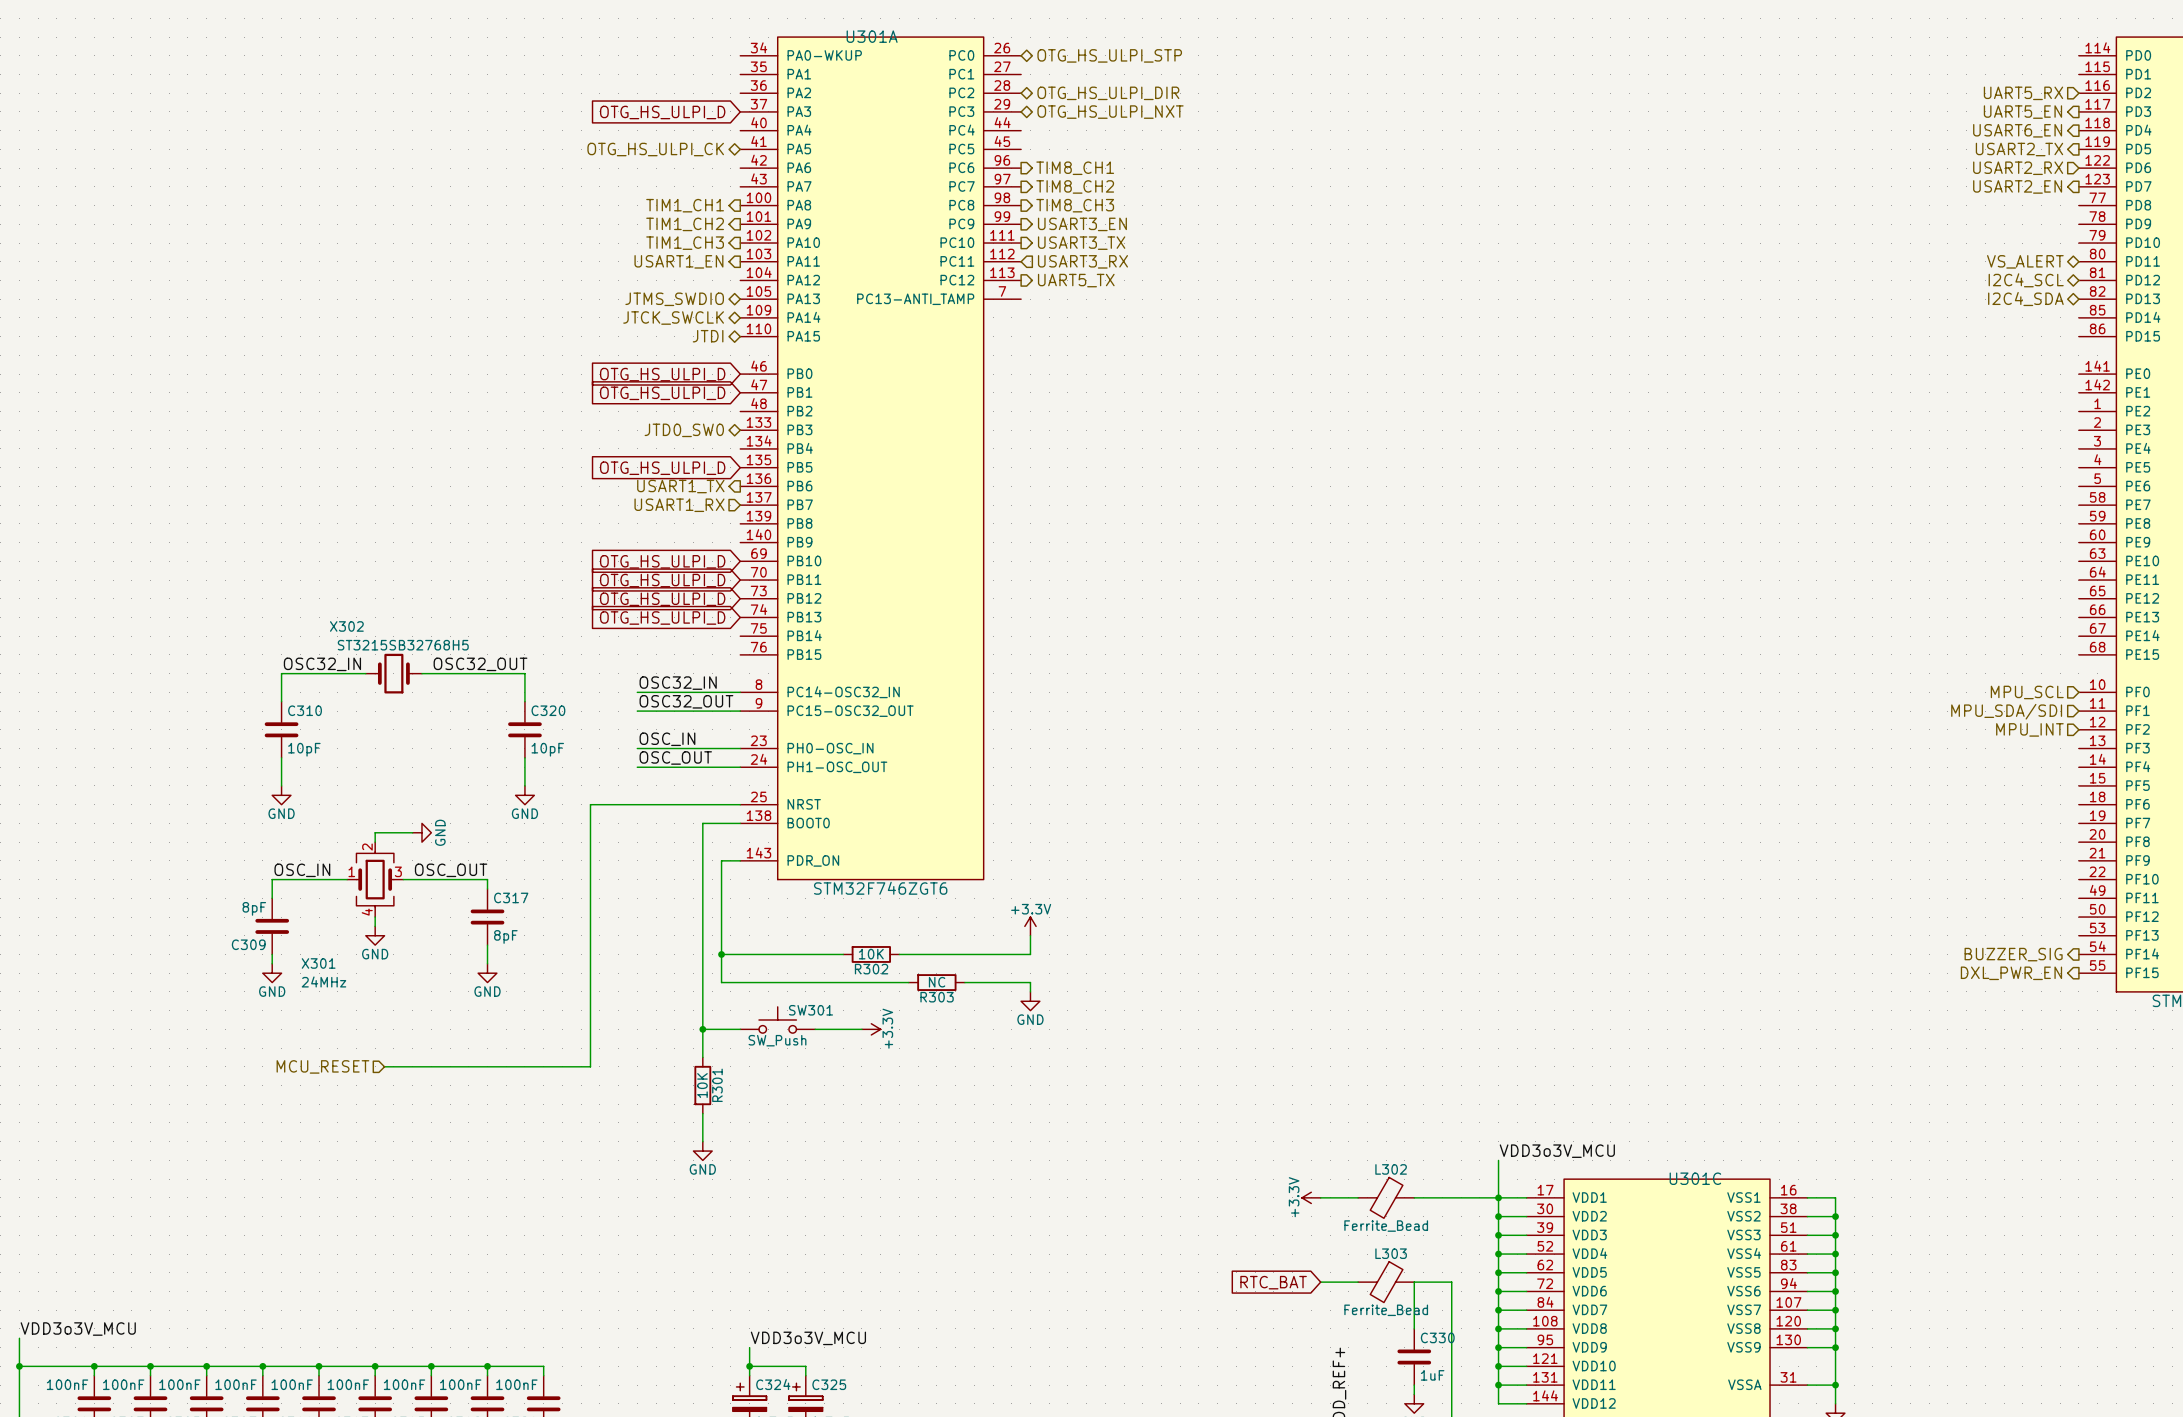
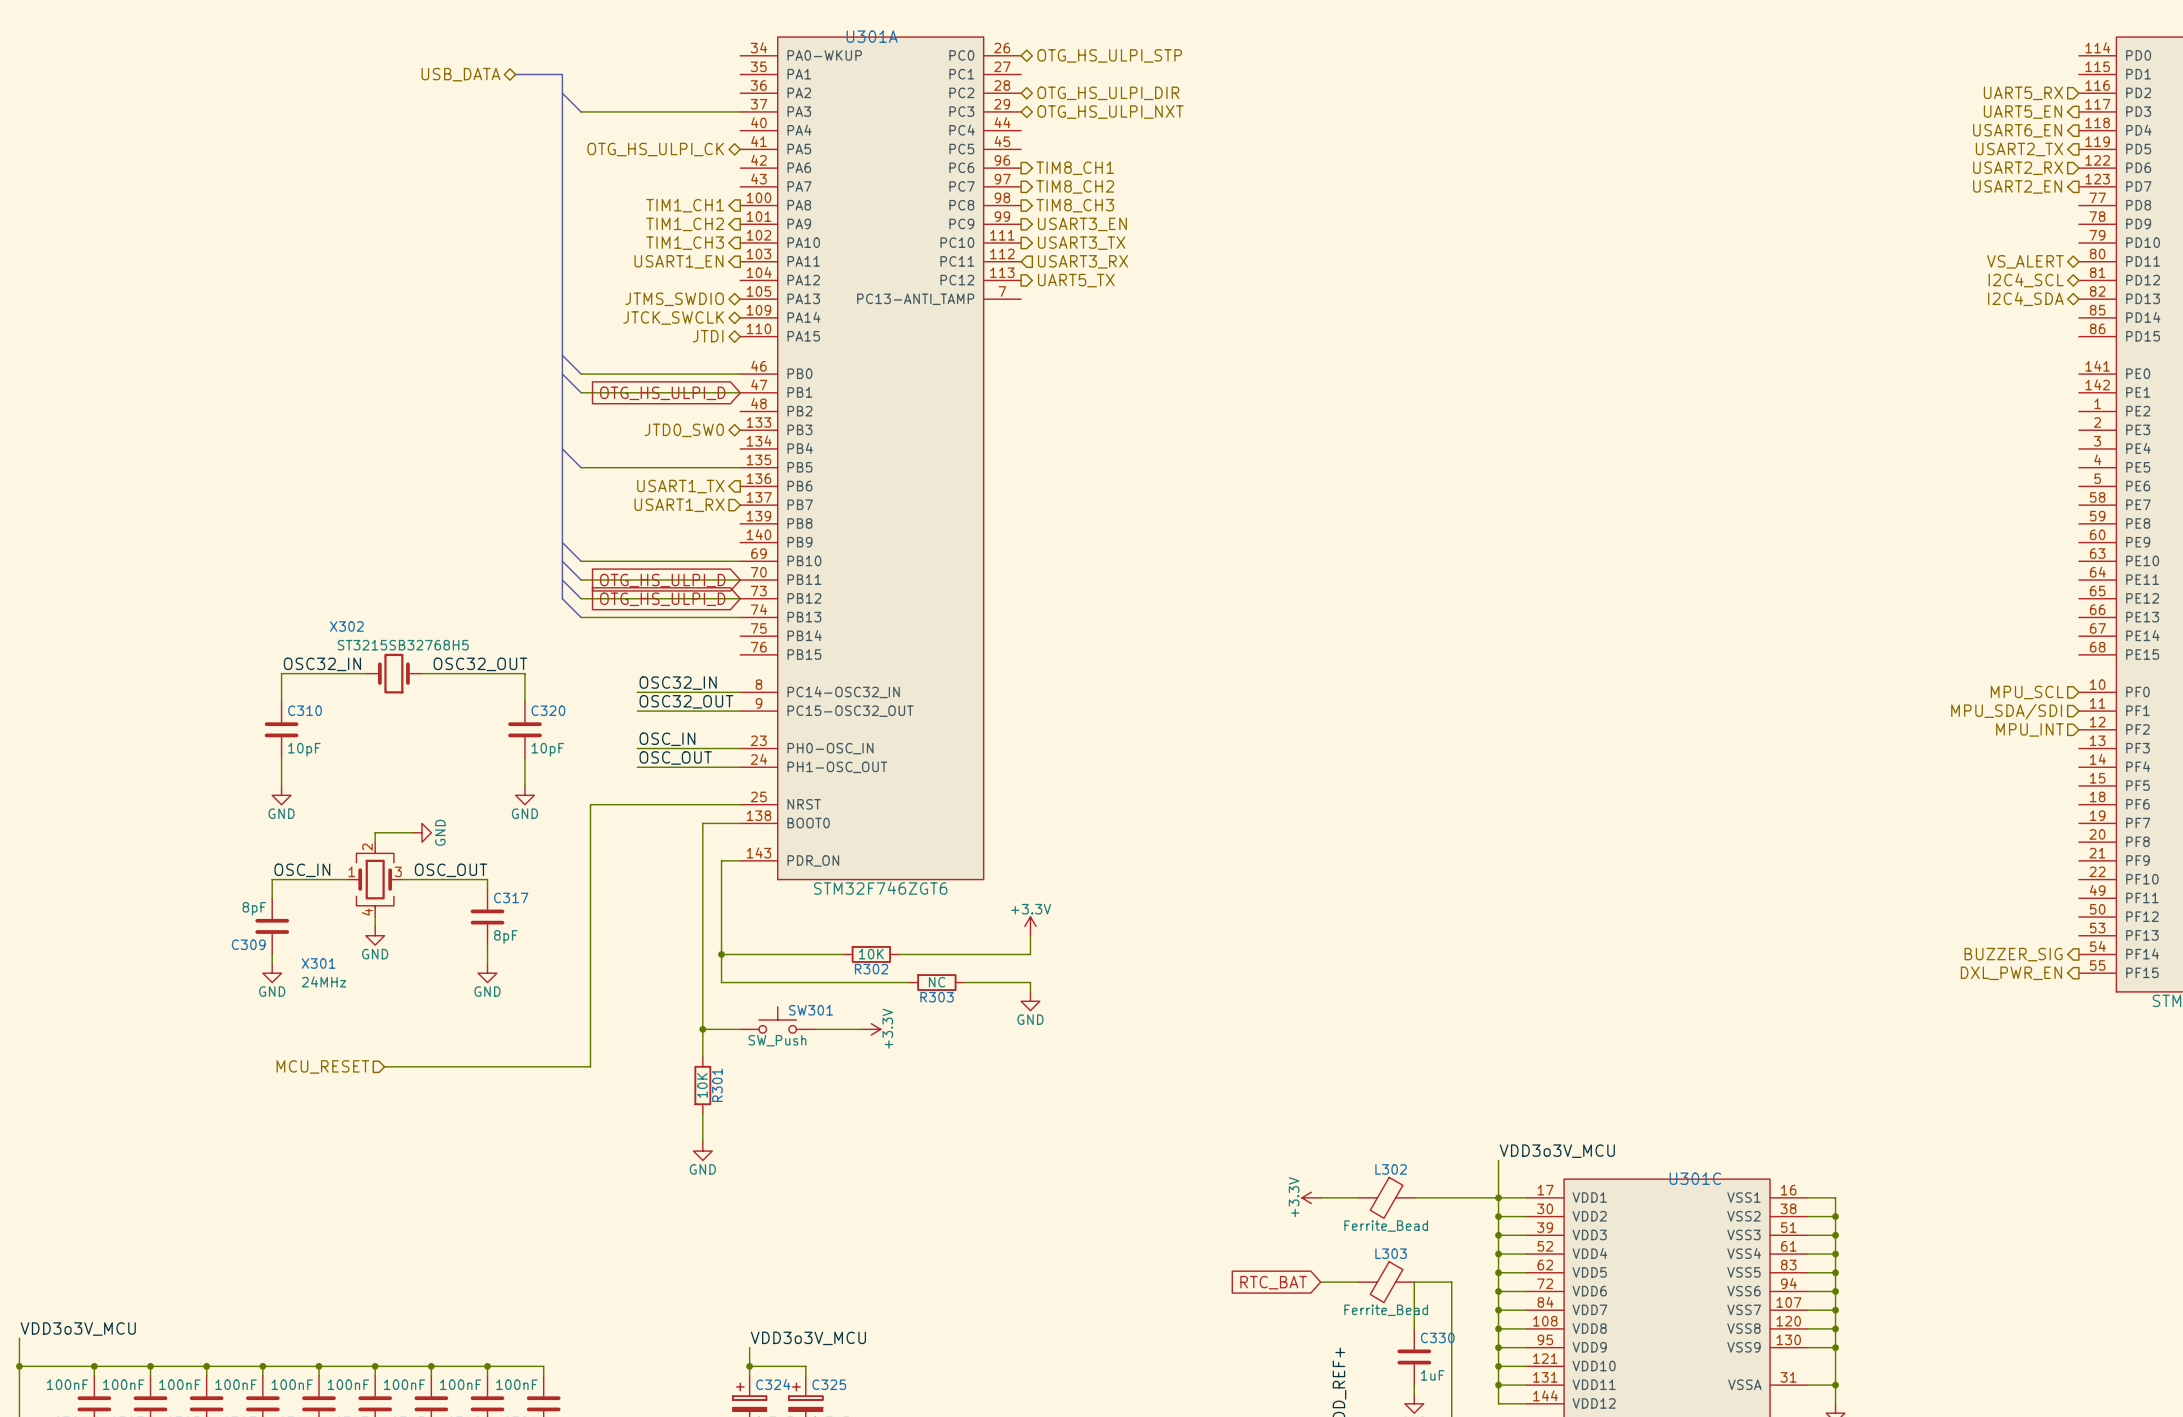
hierarchical label: none -> USB_DATA (460, 74)
bus: none -> (515, 74) (562, 74) (562, 598) (581, 617)
bus: none -> (562, 93) (581, 111)
wire: none -> (581, 111) (740, 111)
global label: OTG_HS_ULPI_D (662, 112) -> none
bus: none -> (562, 355) (581, 374)
bus: none -> (562, 374) (581, 392)
wire: none -> (581, 374) (740, 374)
global label: OTG_HS_ULPI_D (662, 374) -> none
wire: none -> (581, 392) (740, 392)
bus: none -> (562, 448) (581, 467)
wire: none -> (581, 467) (740, 467)
global label: OTG_HS_ULPI_D (662, 468) -> none
bus: none -> (562, 542) (581, 561)
bus: none -> (562, 561) (581, 580)
wire: none -> (581, 561) (740, 561)
global label: OTG_HS_ULPI_D (662, 561) -> none
bus: none -> (562, 580) (581, 598)
wire: none -> (581, 580) (740, 580)
wire: none -> (581, 598) (740, 598)
wire: none -> (581, 617) (740, 617)
global label: OTG_HS_ULPI_D (662, 618) -> none

